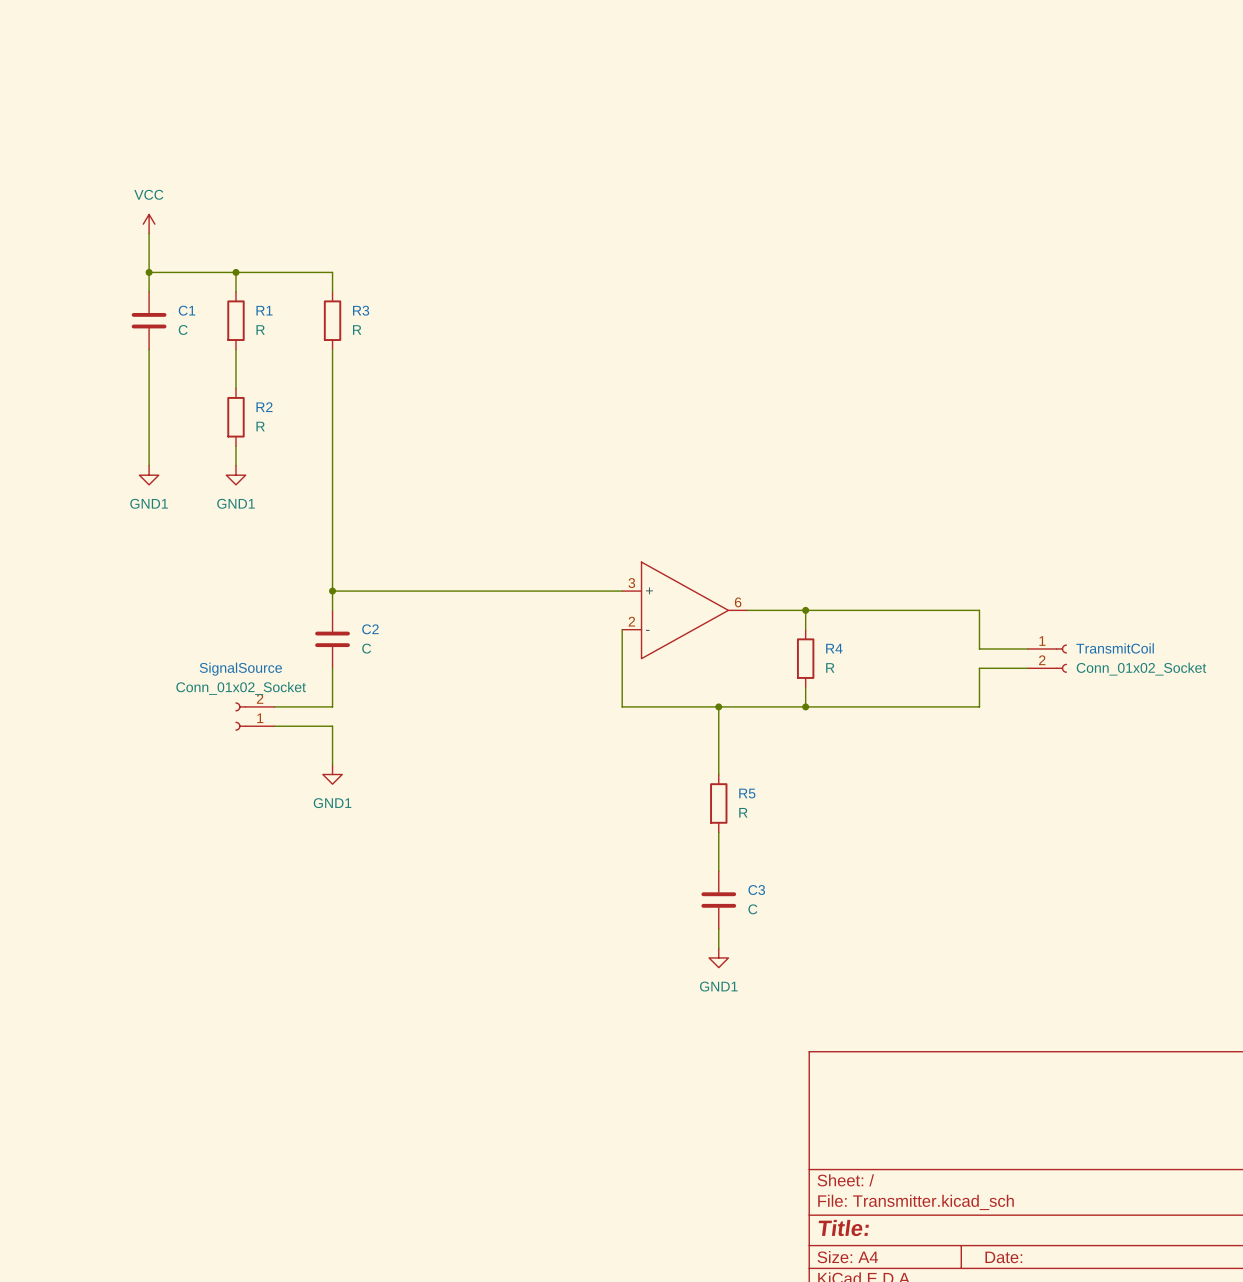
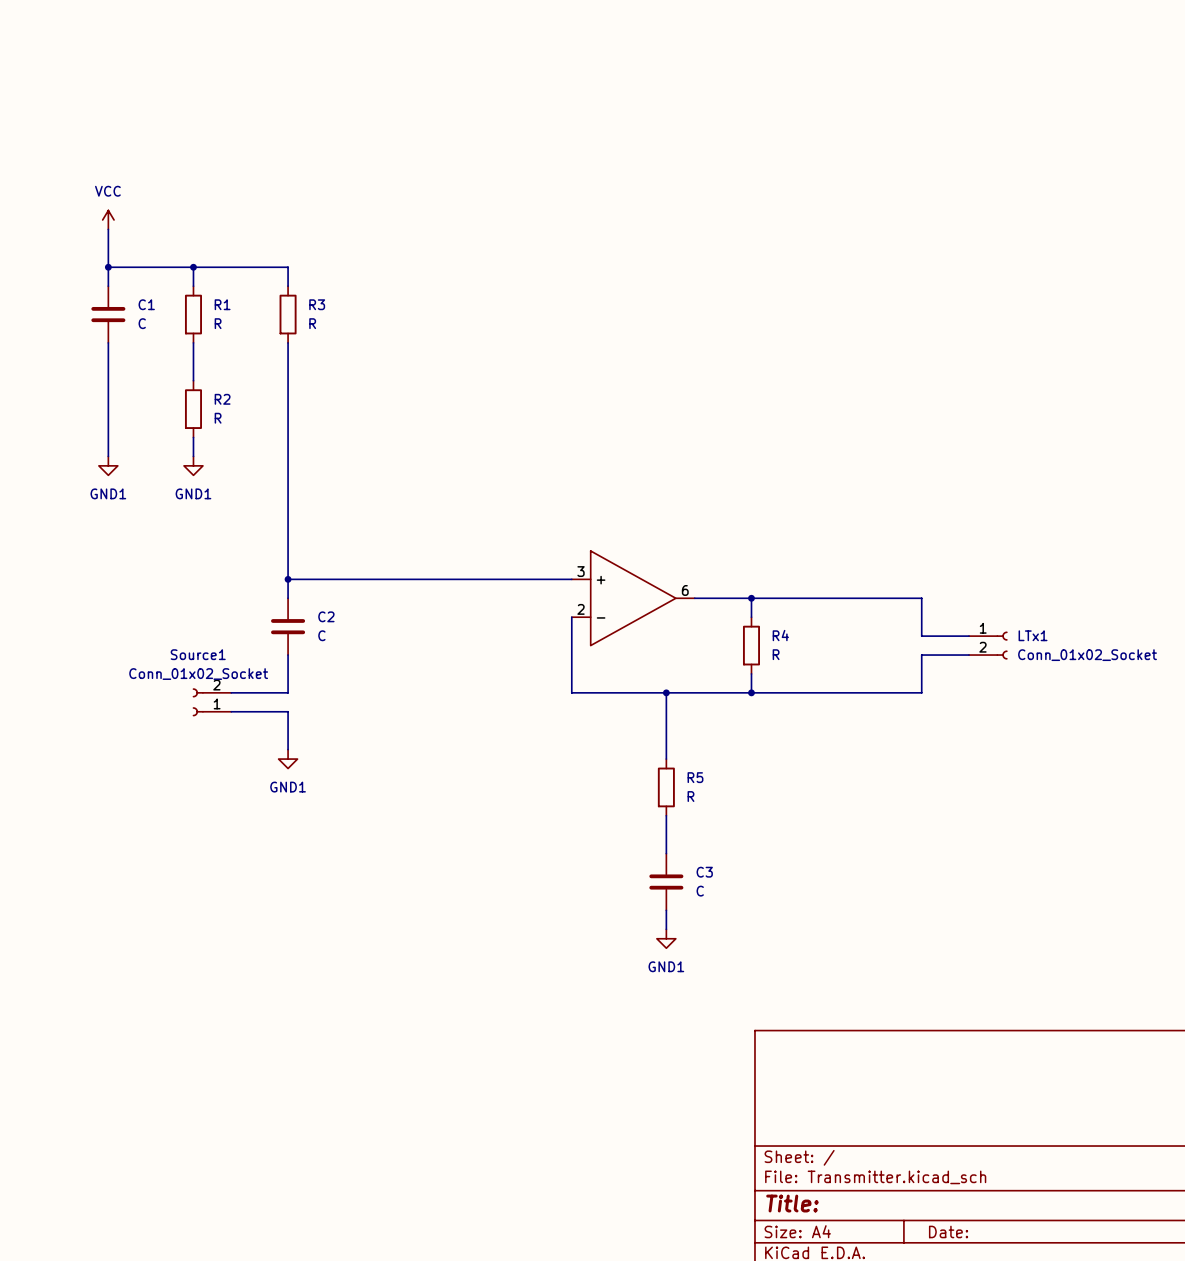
TransmitCoil name: TransmitCoil (1115, 648) -> LTx1 (1033, 635)
SignalSource name: SignalSource (240, 669) -> Source1 (198, 654)

